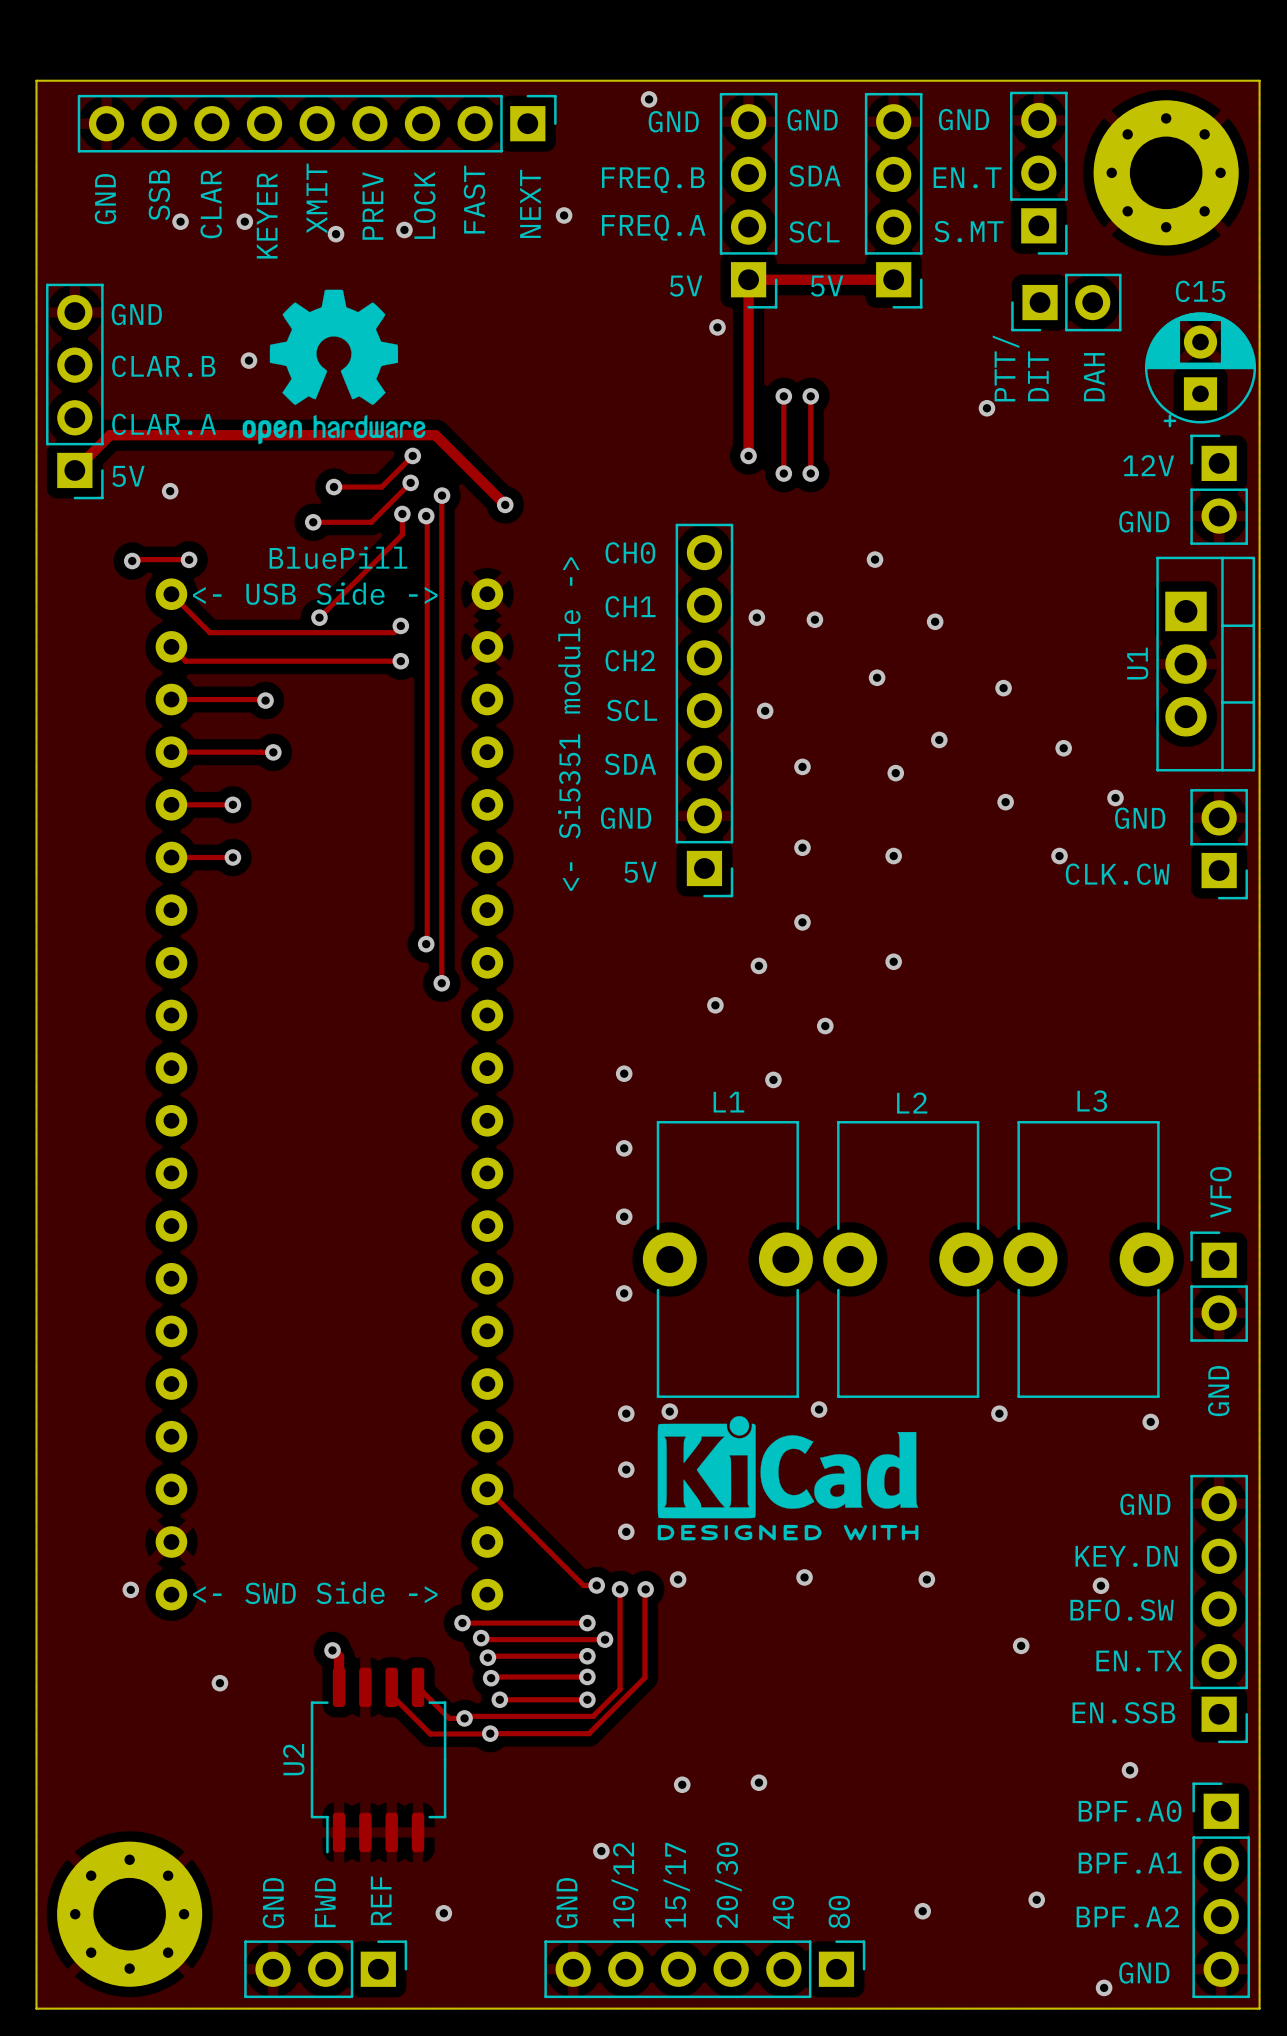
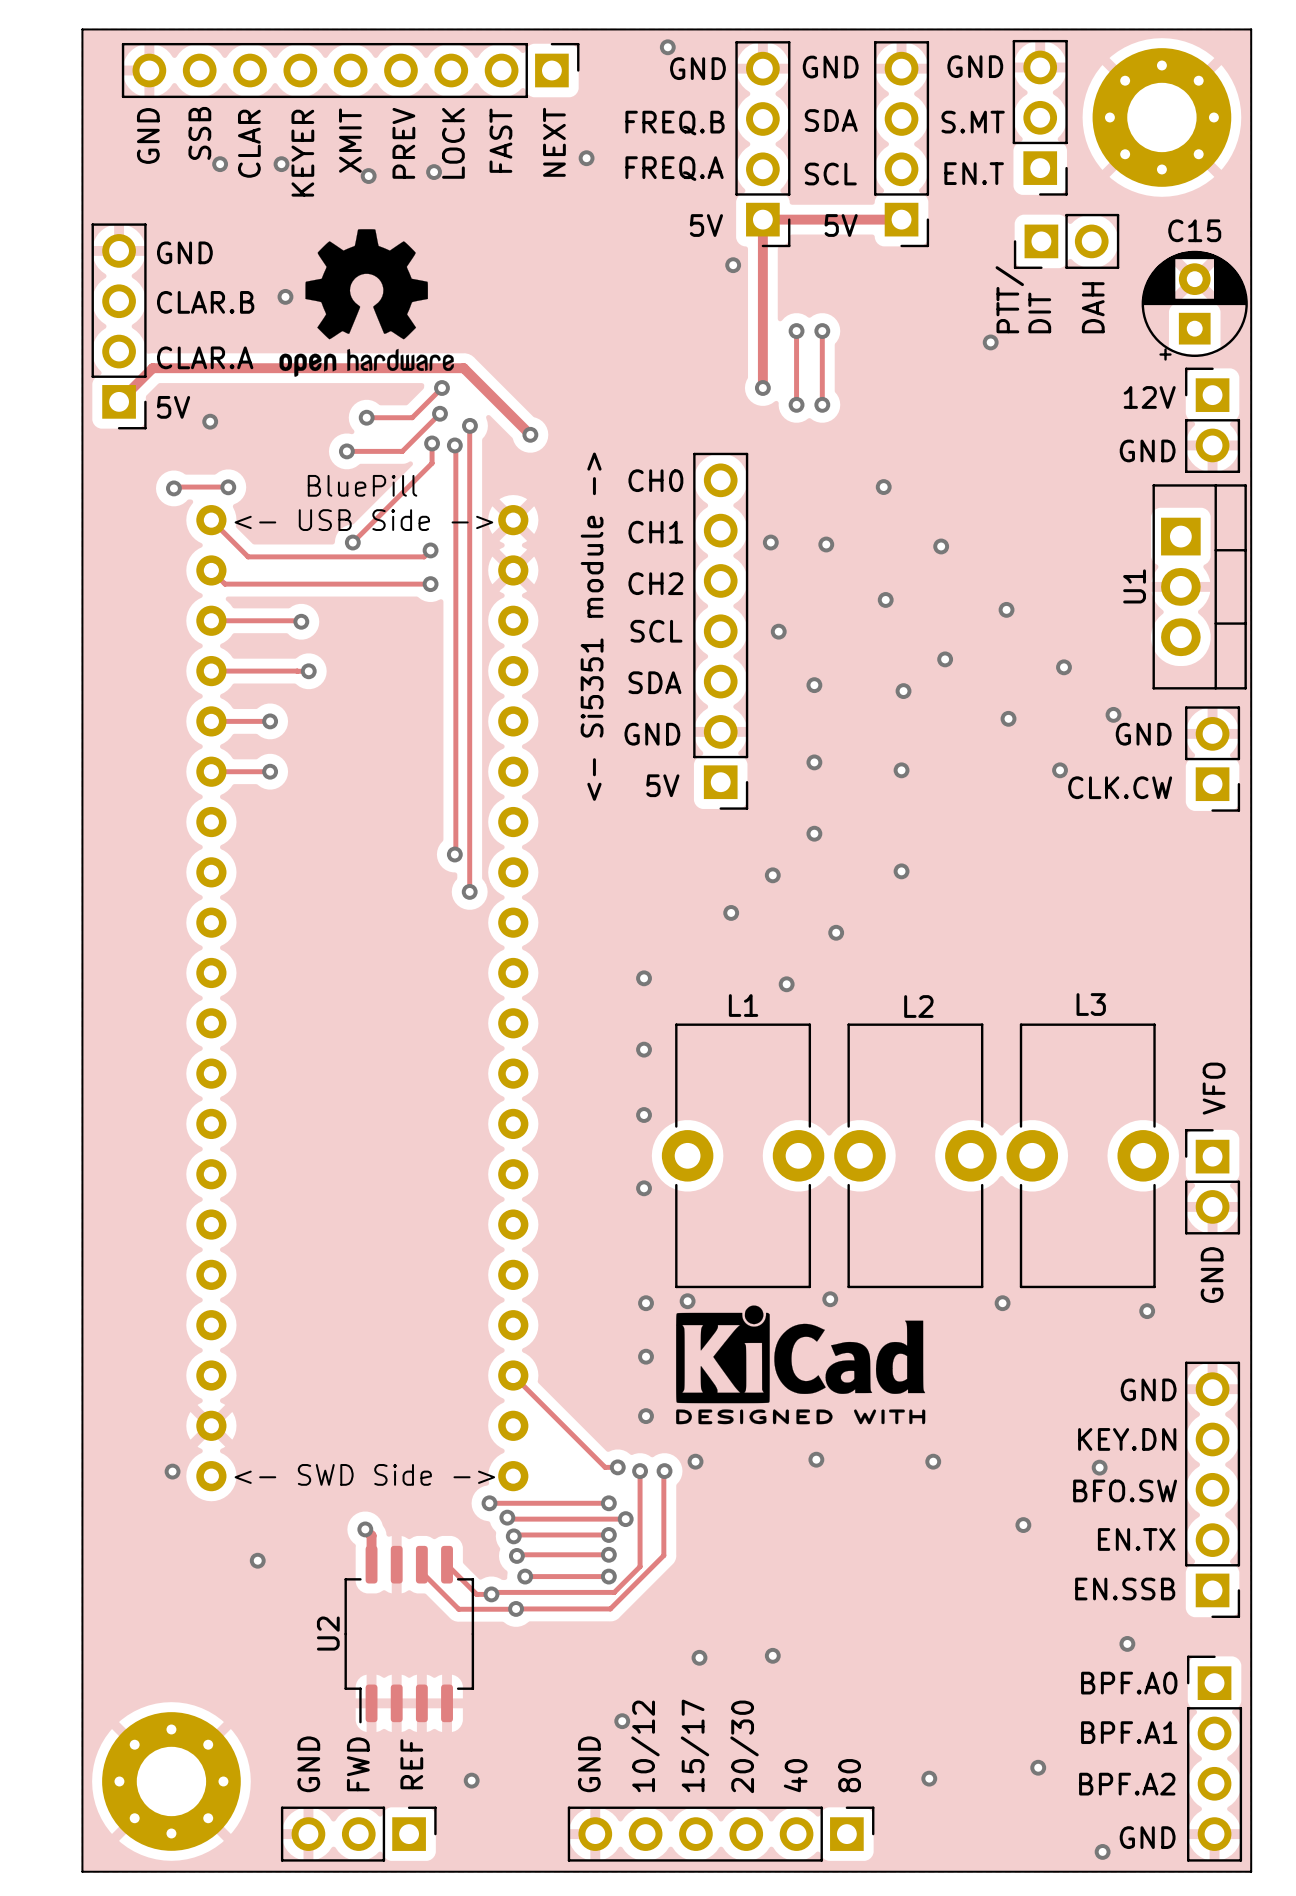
text: EN.T (967, 177) -> S.MT (973, 122)
text: S.MT (969, 231) -> EN.T (974, 173)

